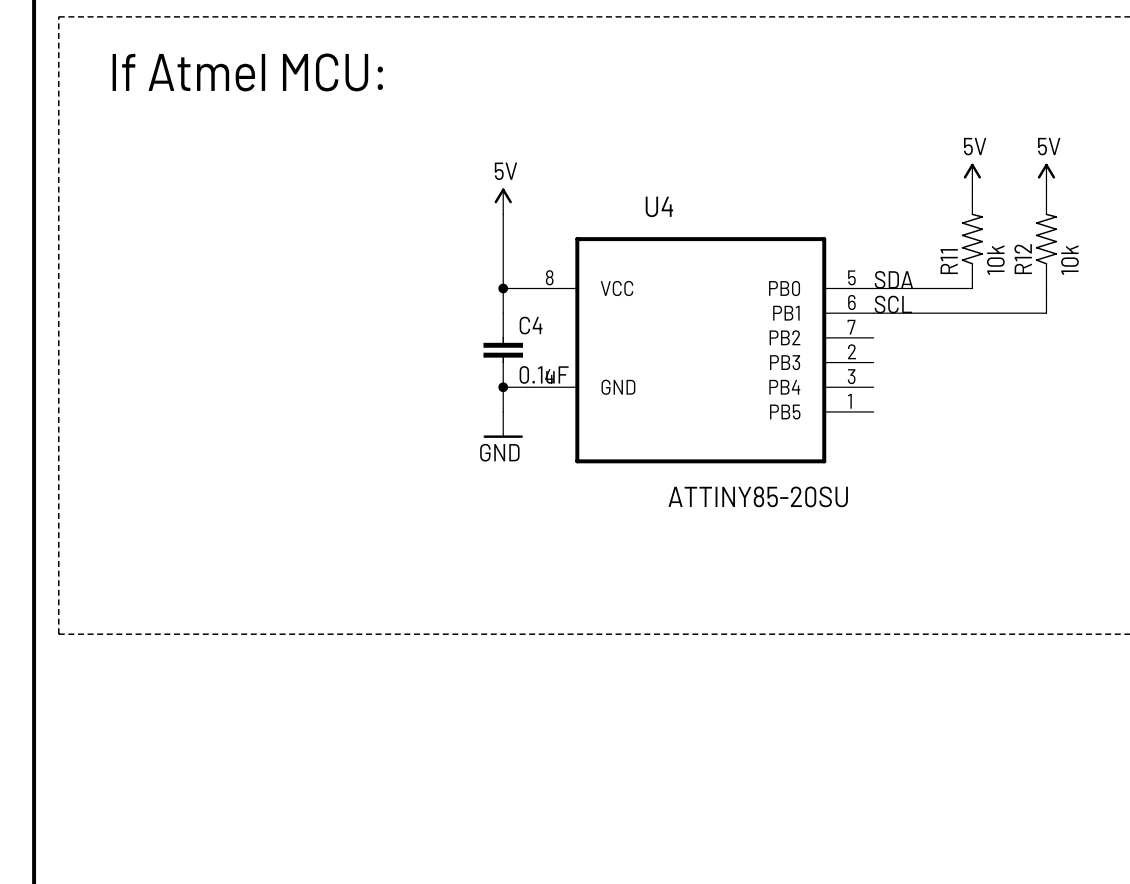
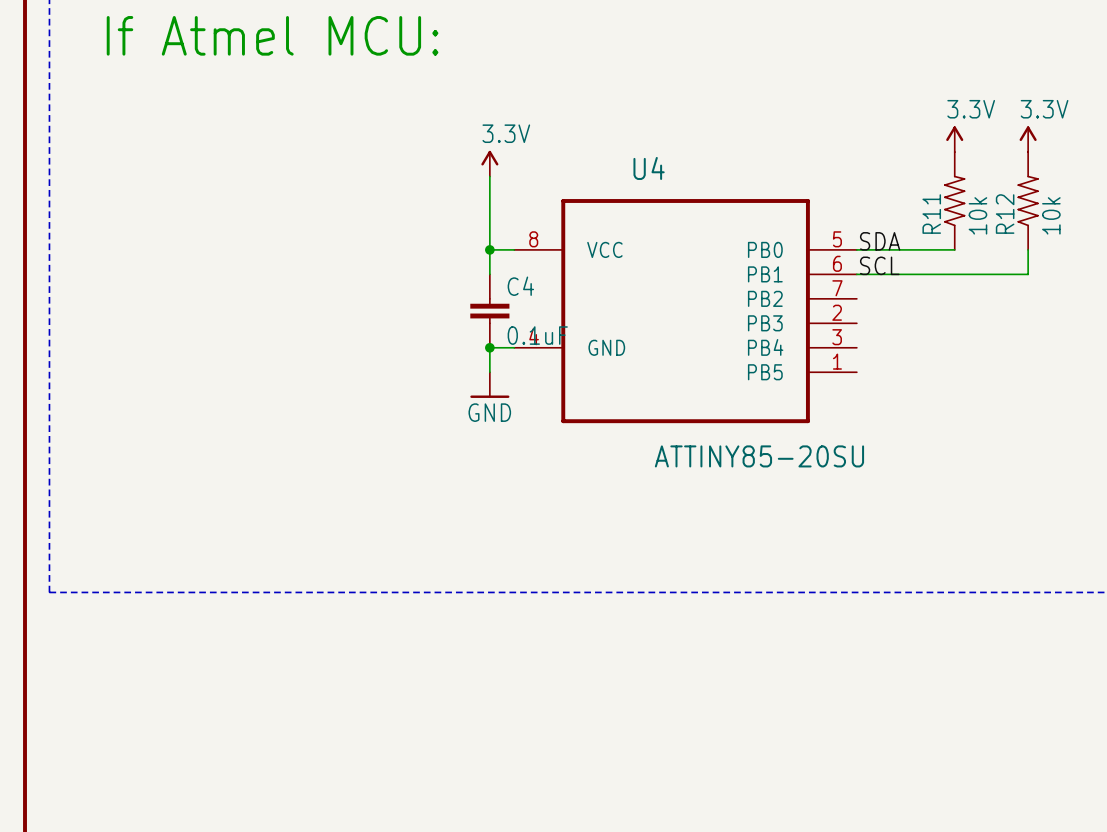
power symbol: 5V (972, 176) -> 3.3V (954, 139)
power symbol: 5V (1046, 176) -> 3.3V (1028, 139)
power symbol: 5V (503, 201) -> 3.3V (489, 163)

